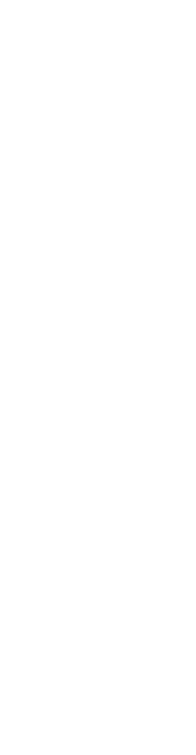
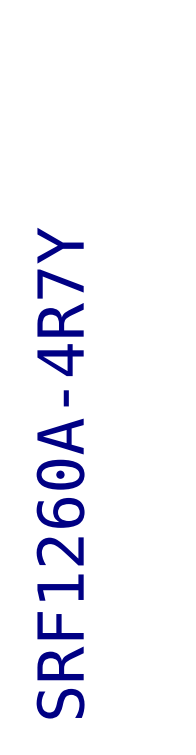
text: none -> SRF1260A-4R7Y (60, 473)

